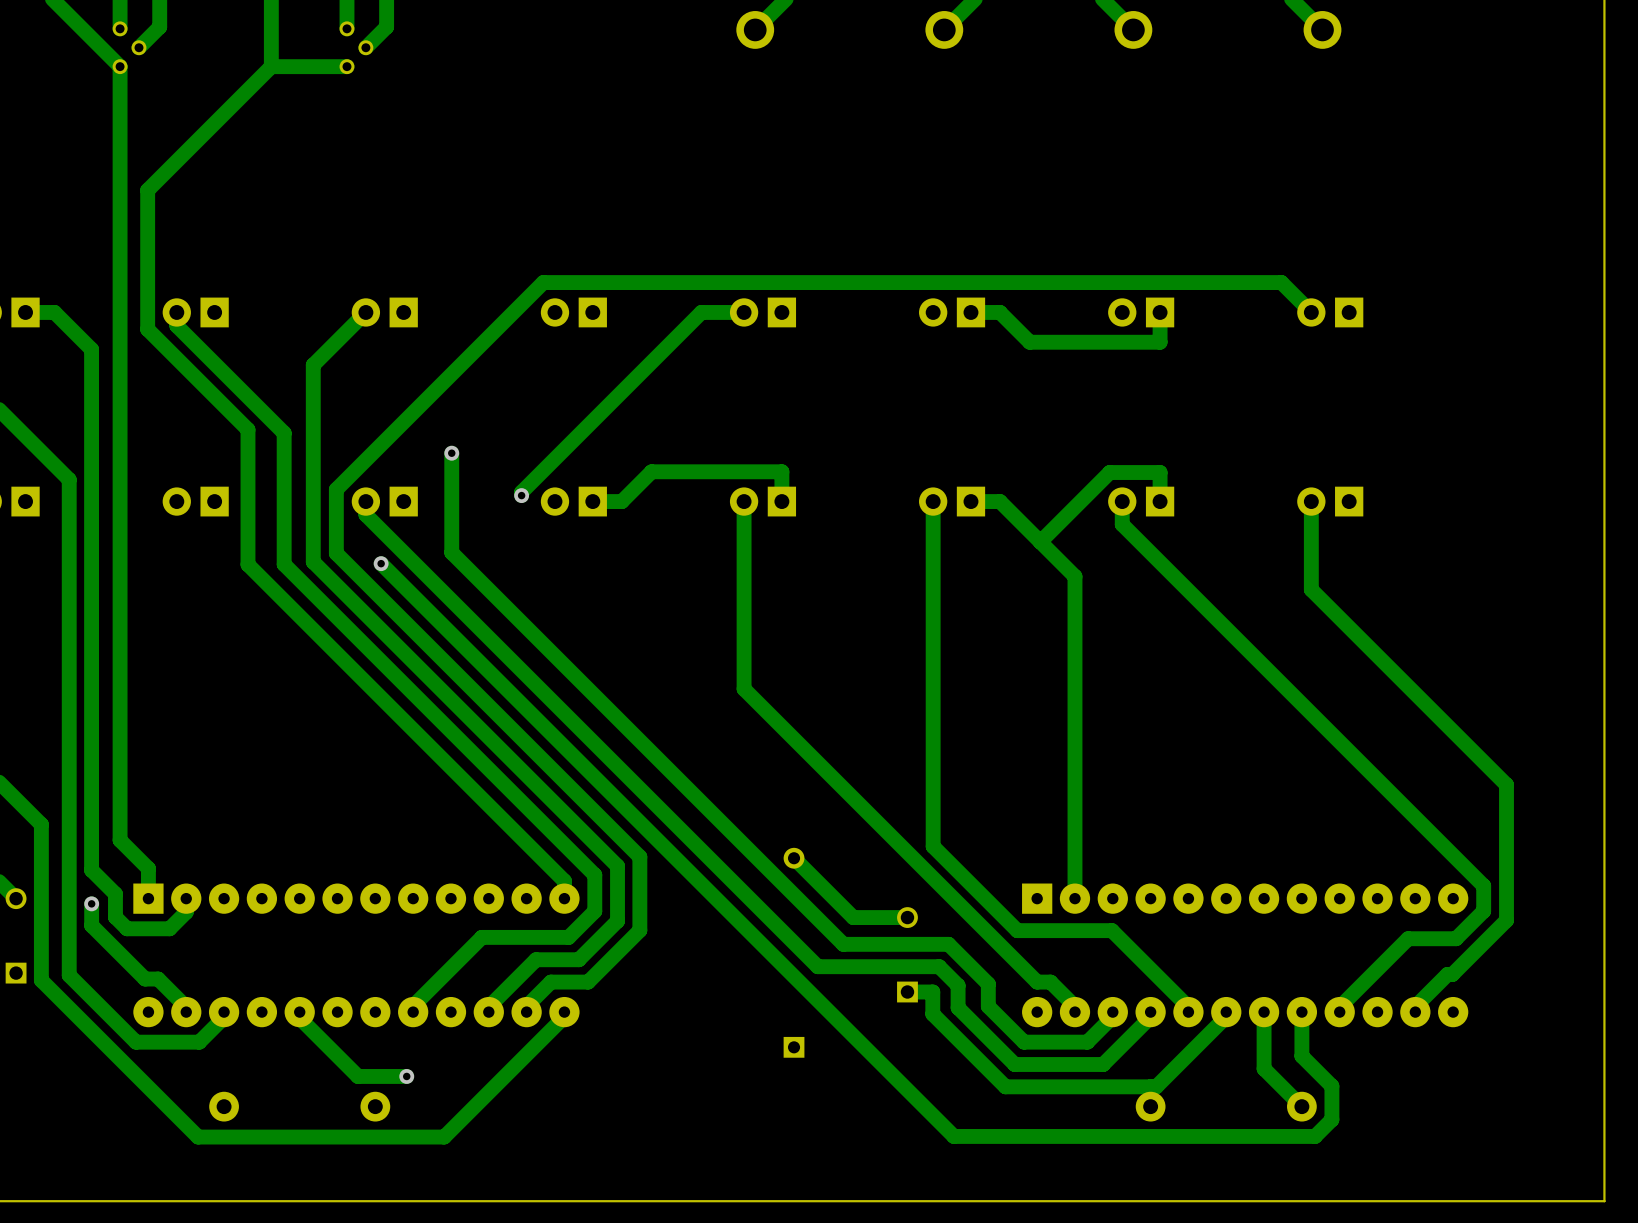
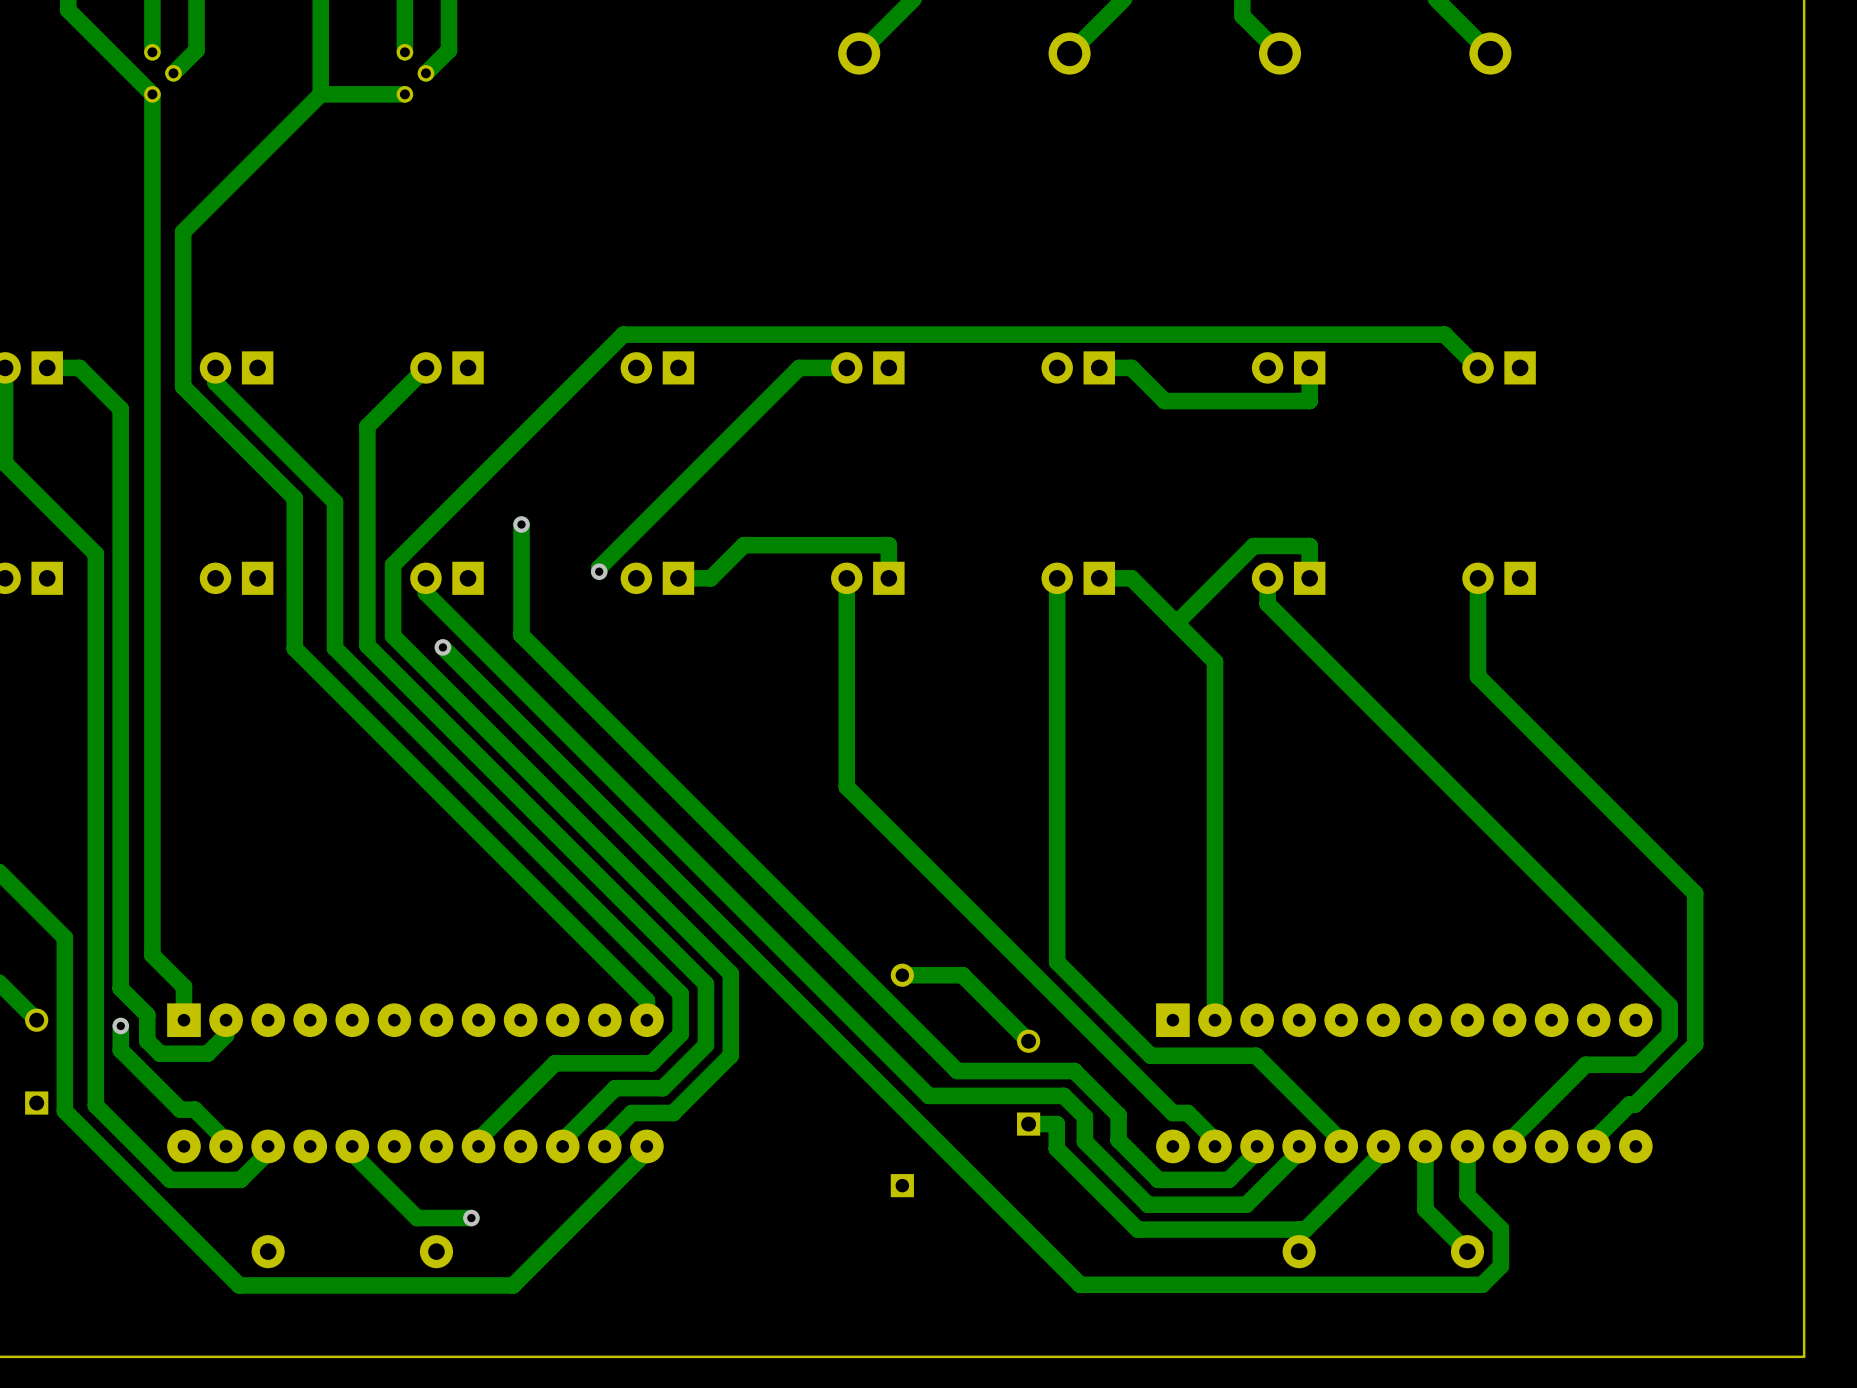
track: (794, 858) (853, 917) (907, 917) -> (902, 975) (962, 975) (1028, 1041)

